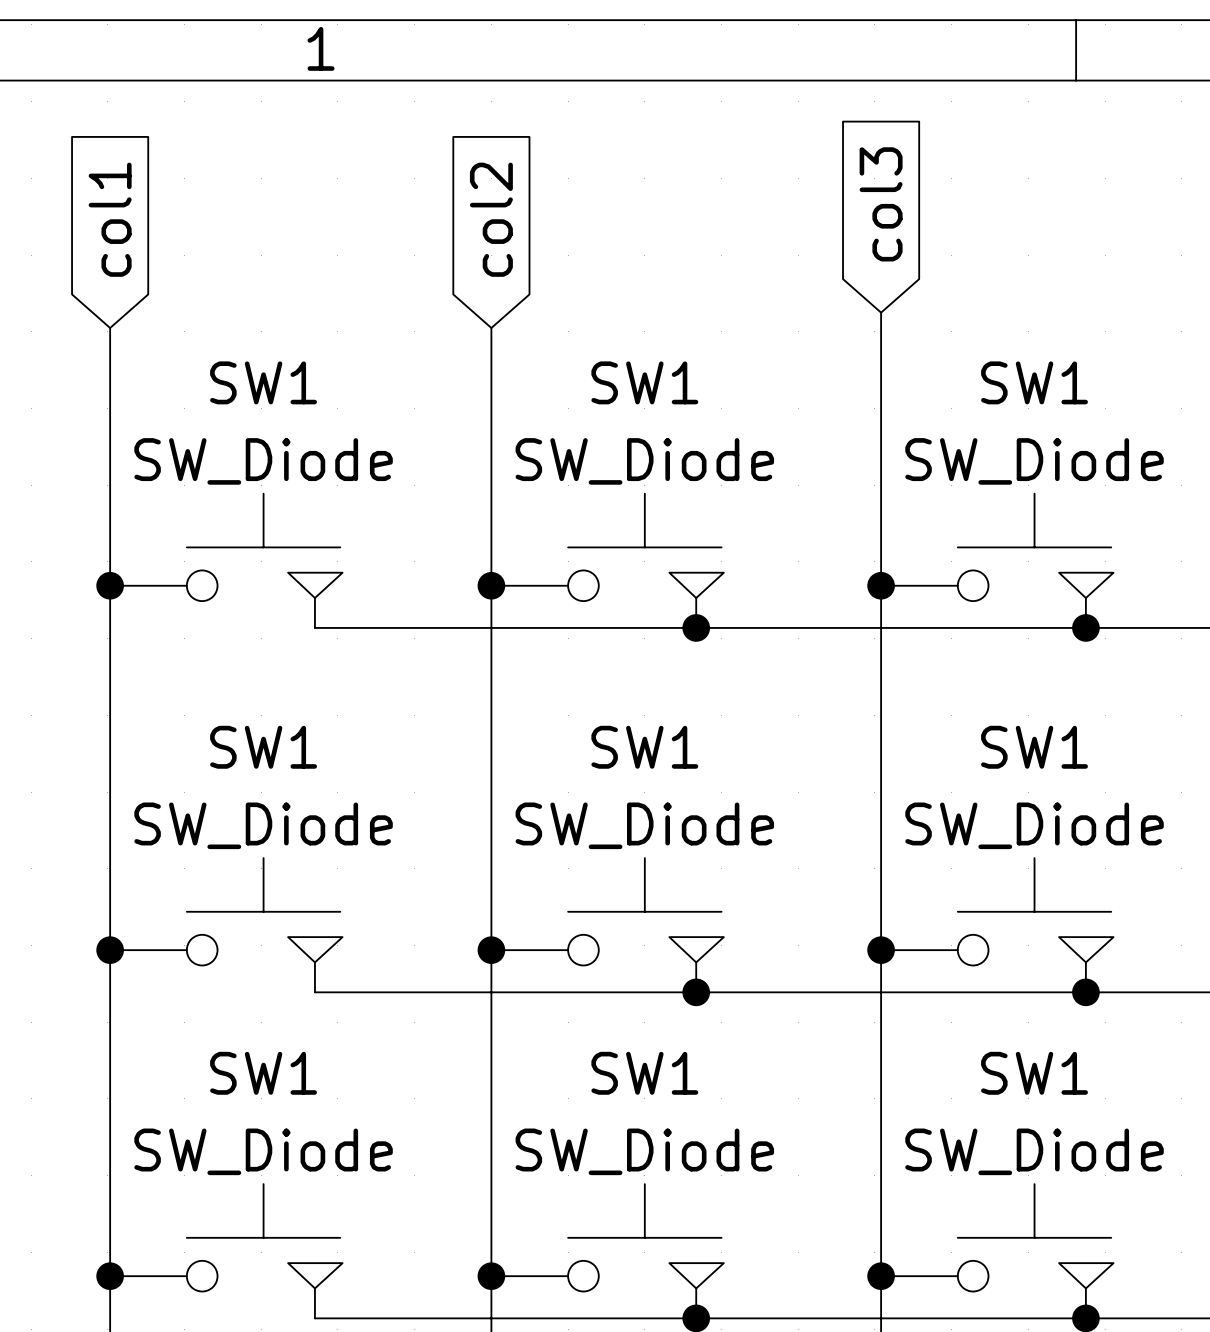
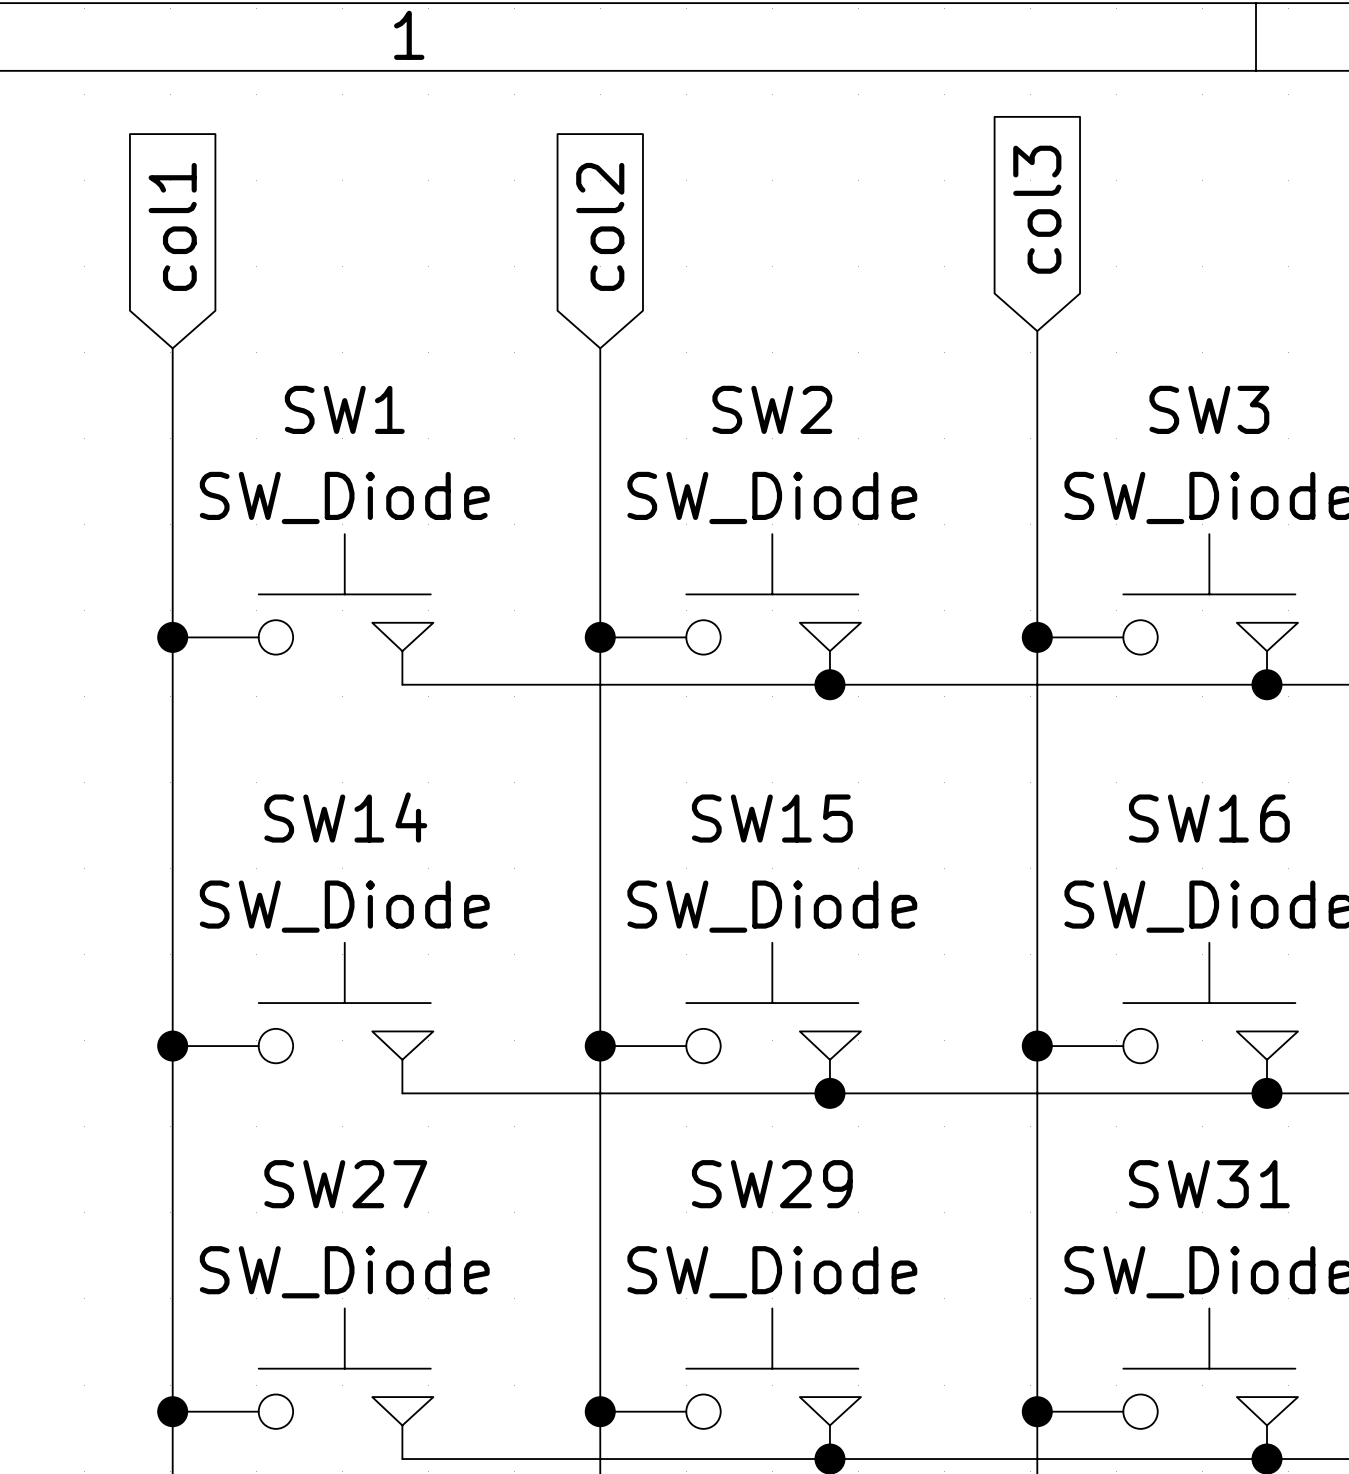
SW1 name: SW1 (644, 382) -> SW2 (772, 409)
SW1 name: SW1 (1034, 382) -> SW3 (1209, 409)
SW1 name: SW1 (263, 747) -> SW14 (345, 817)
SW1 name: SW1 (644, 747) -> SW15 (772, 818)
SW1 name: SW1 (1034, 747) -> SW16 (1209, 818)
SW1 name: SW1 (263, 1073) -> SW27 (345, 1184)
SW1 name: SW1 (644, 1073) -> SW29 (772, 1184)
SW1 name: SW1 (1034, 1073) -> SW31 (1209, 1184)

